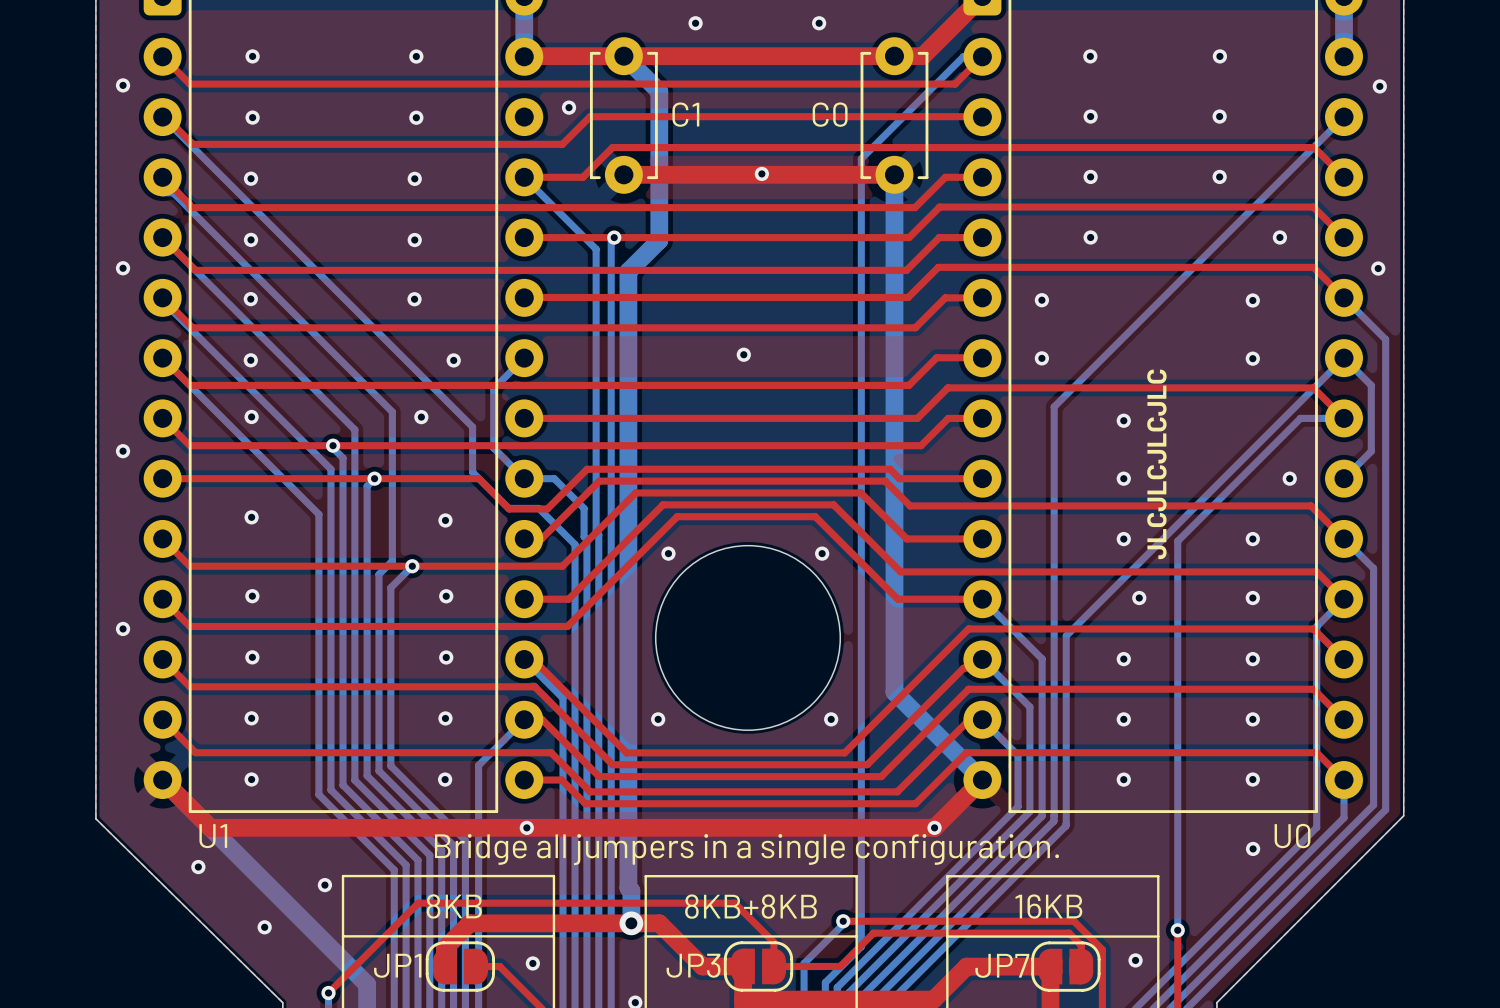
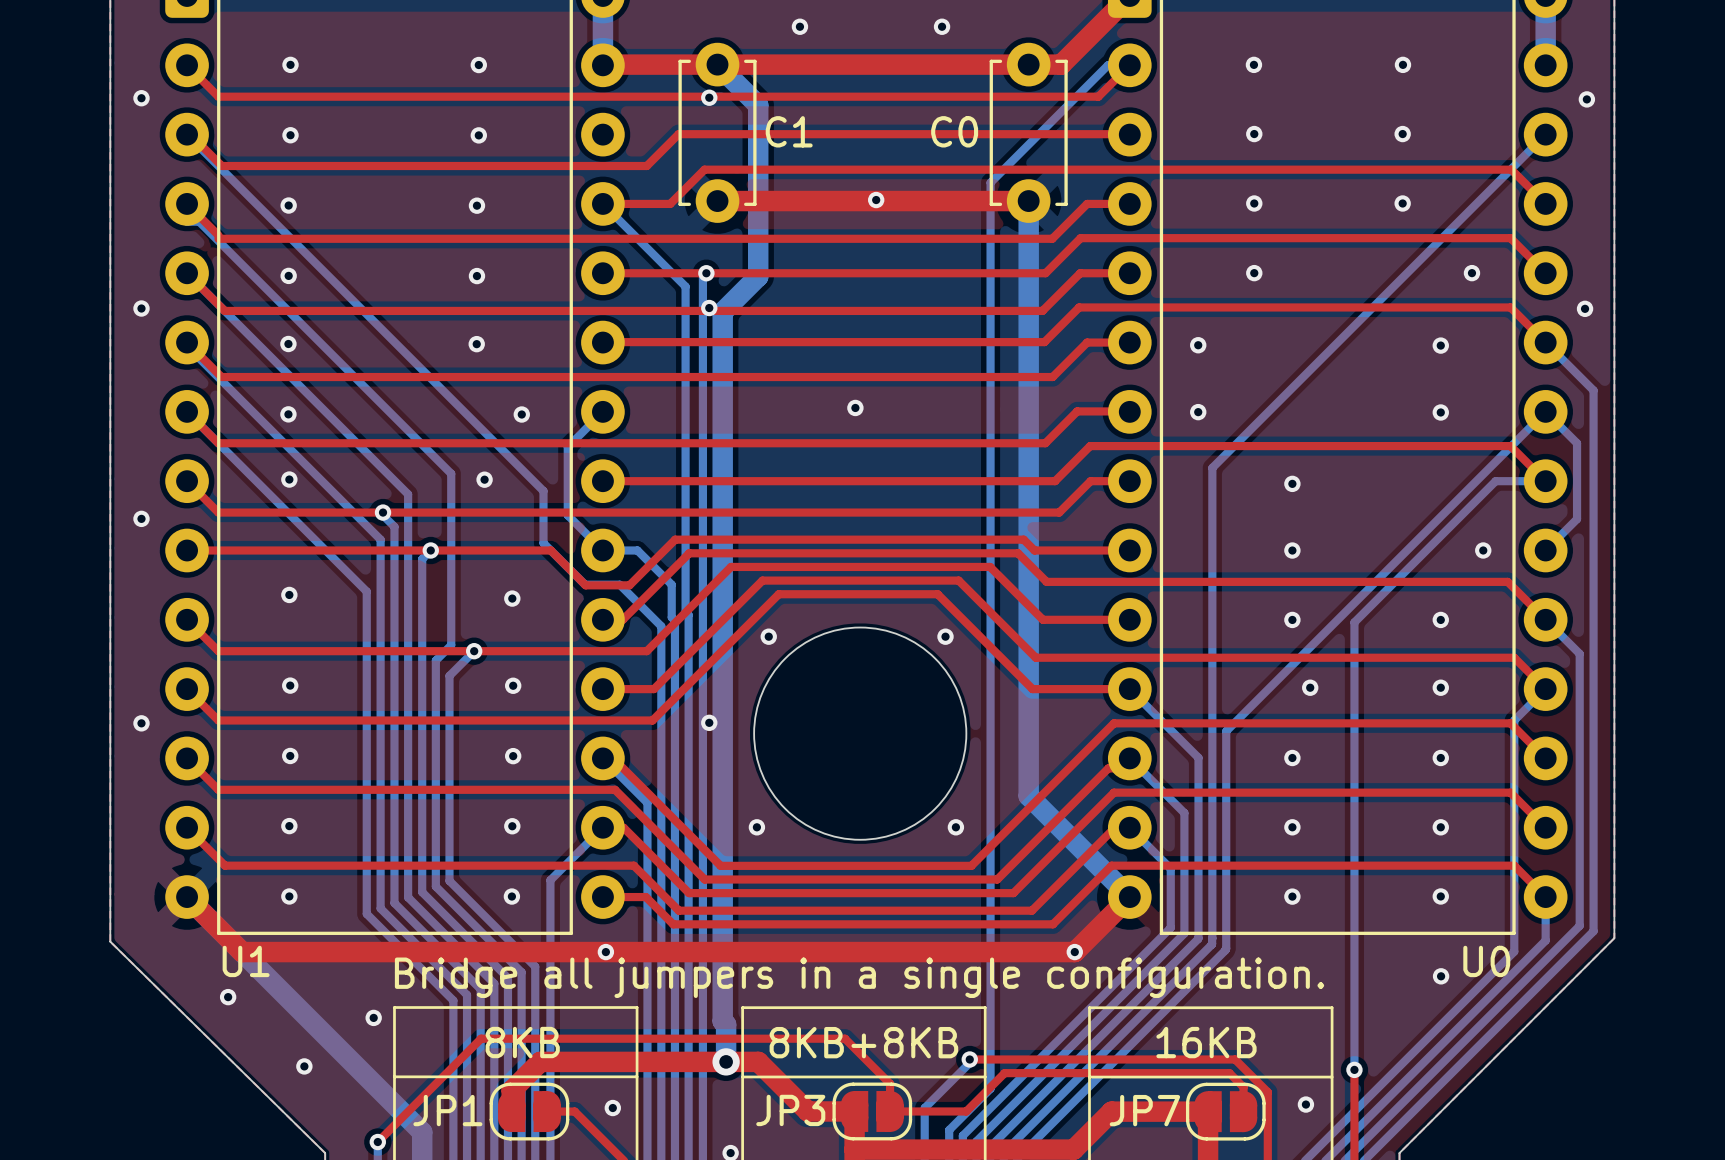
via position: (569, 107) -> (709, 97)
via: none -> (709, 308)
text: JLCJLCJLCJLC (1156, 464) -> none
via: none -> (709, 722)

